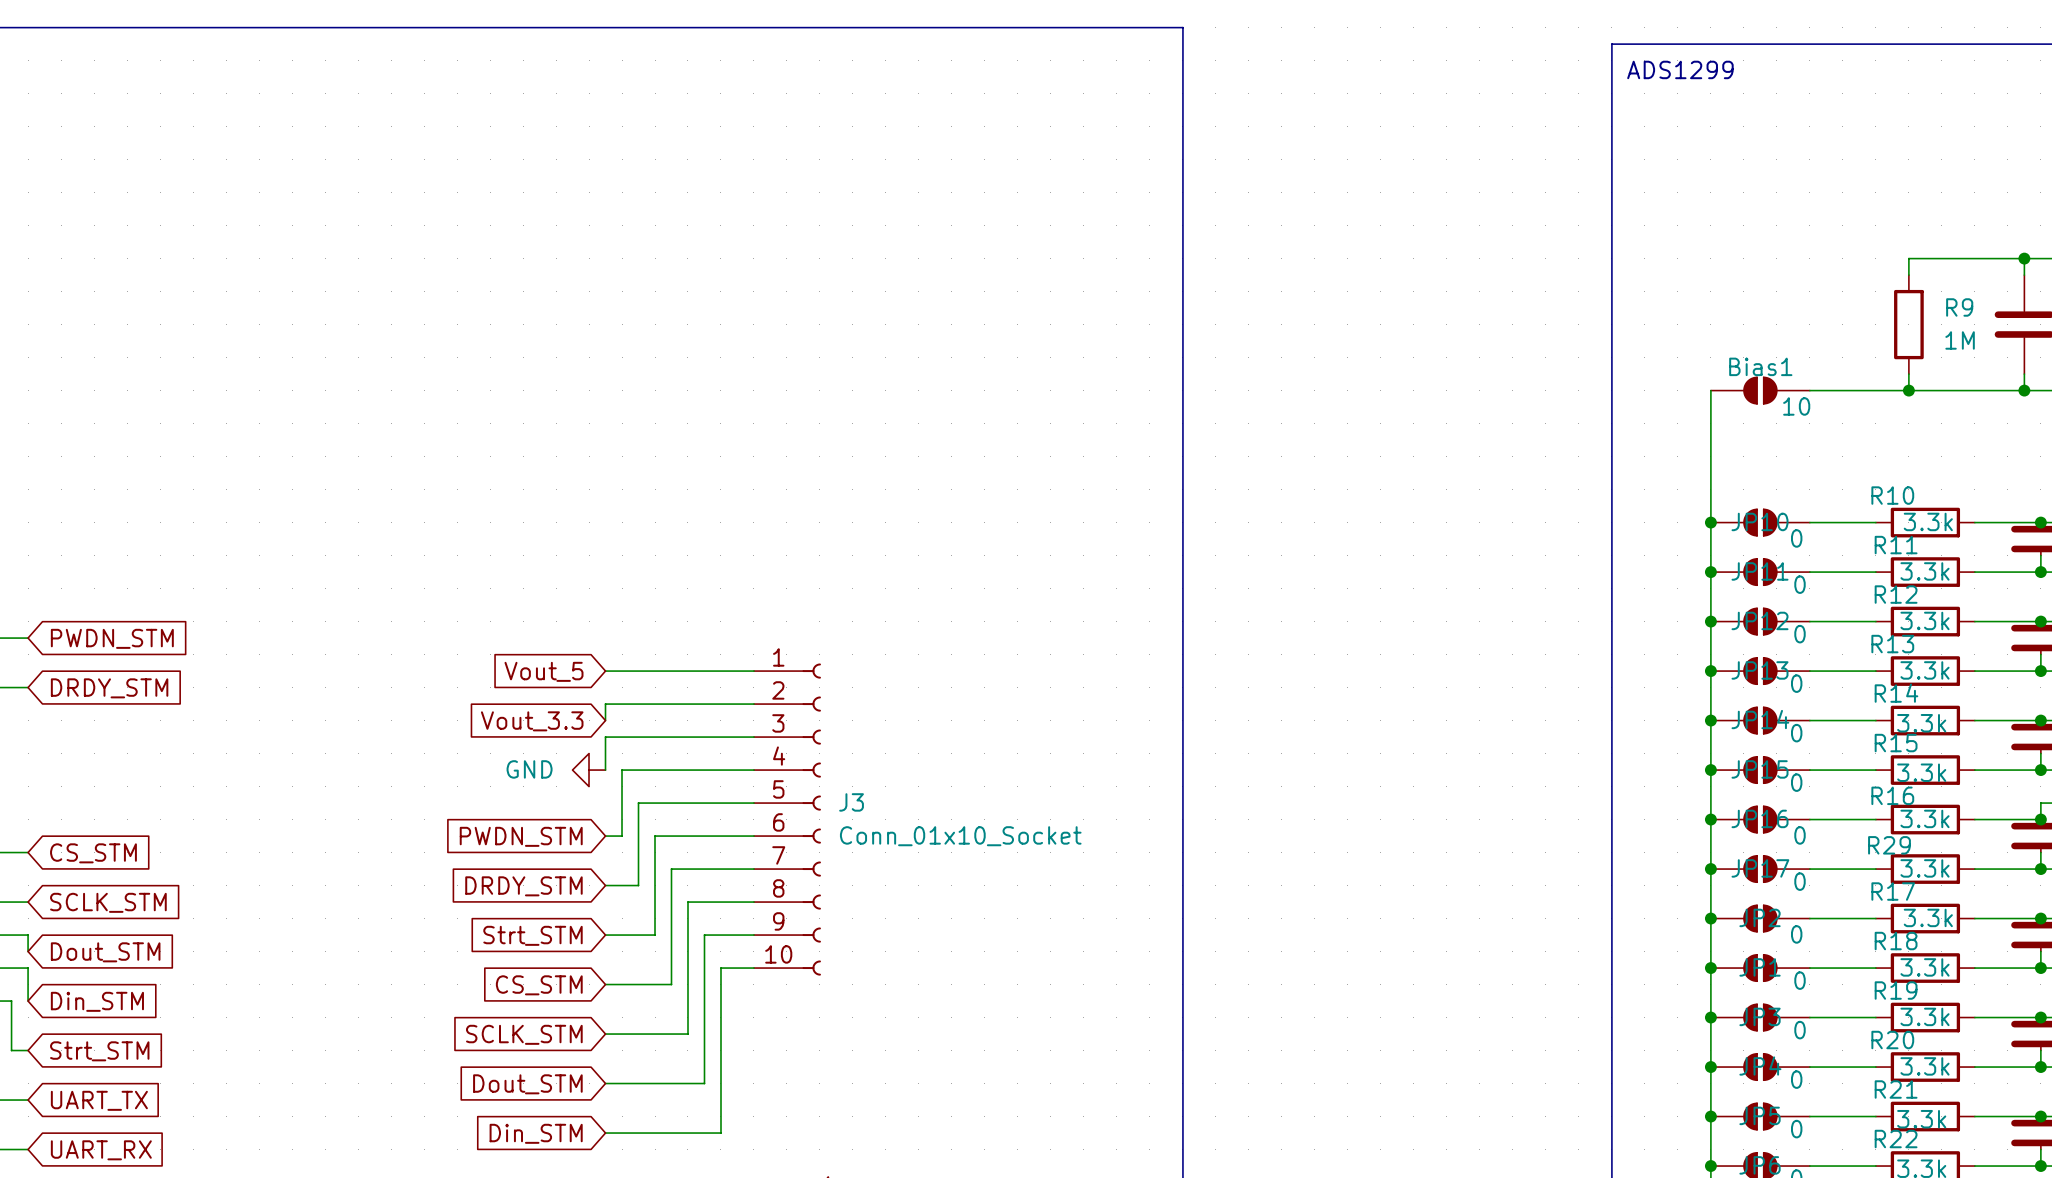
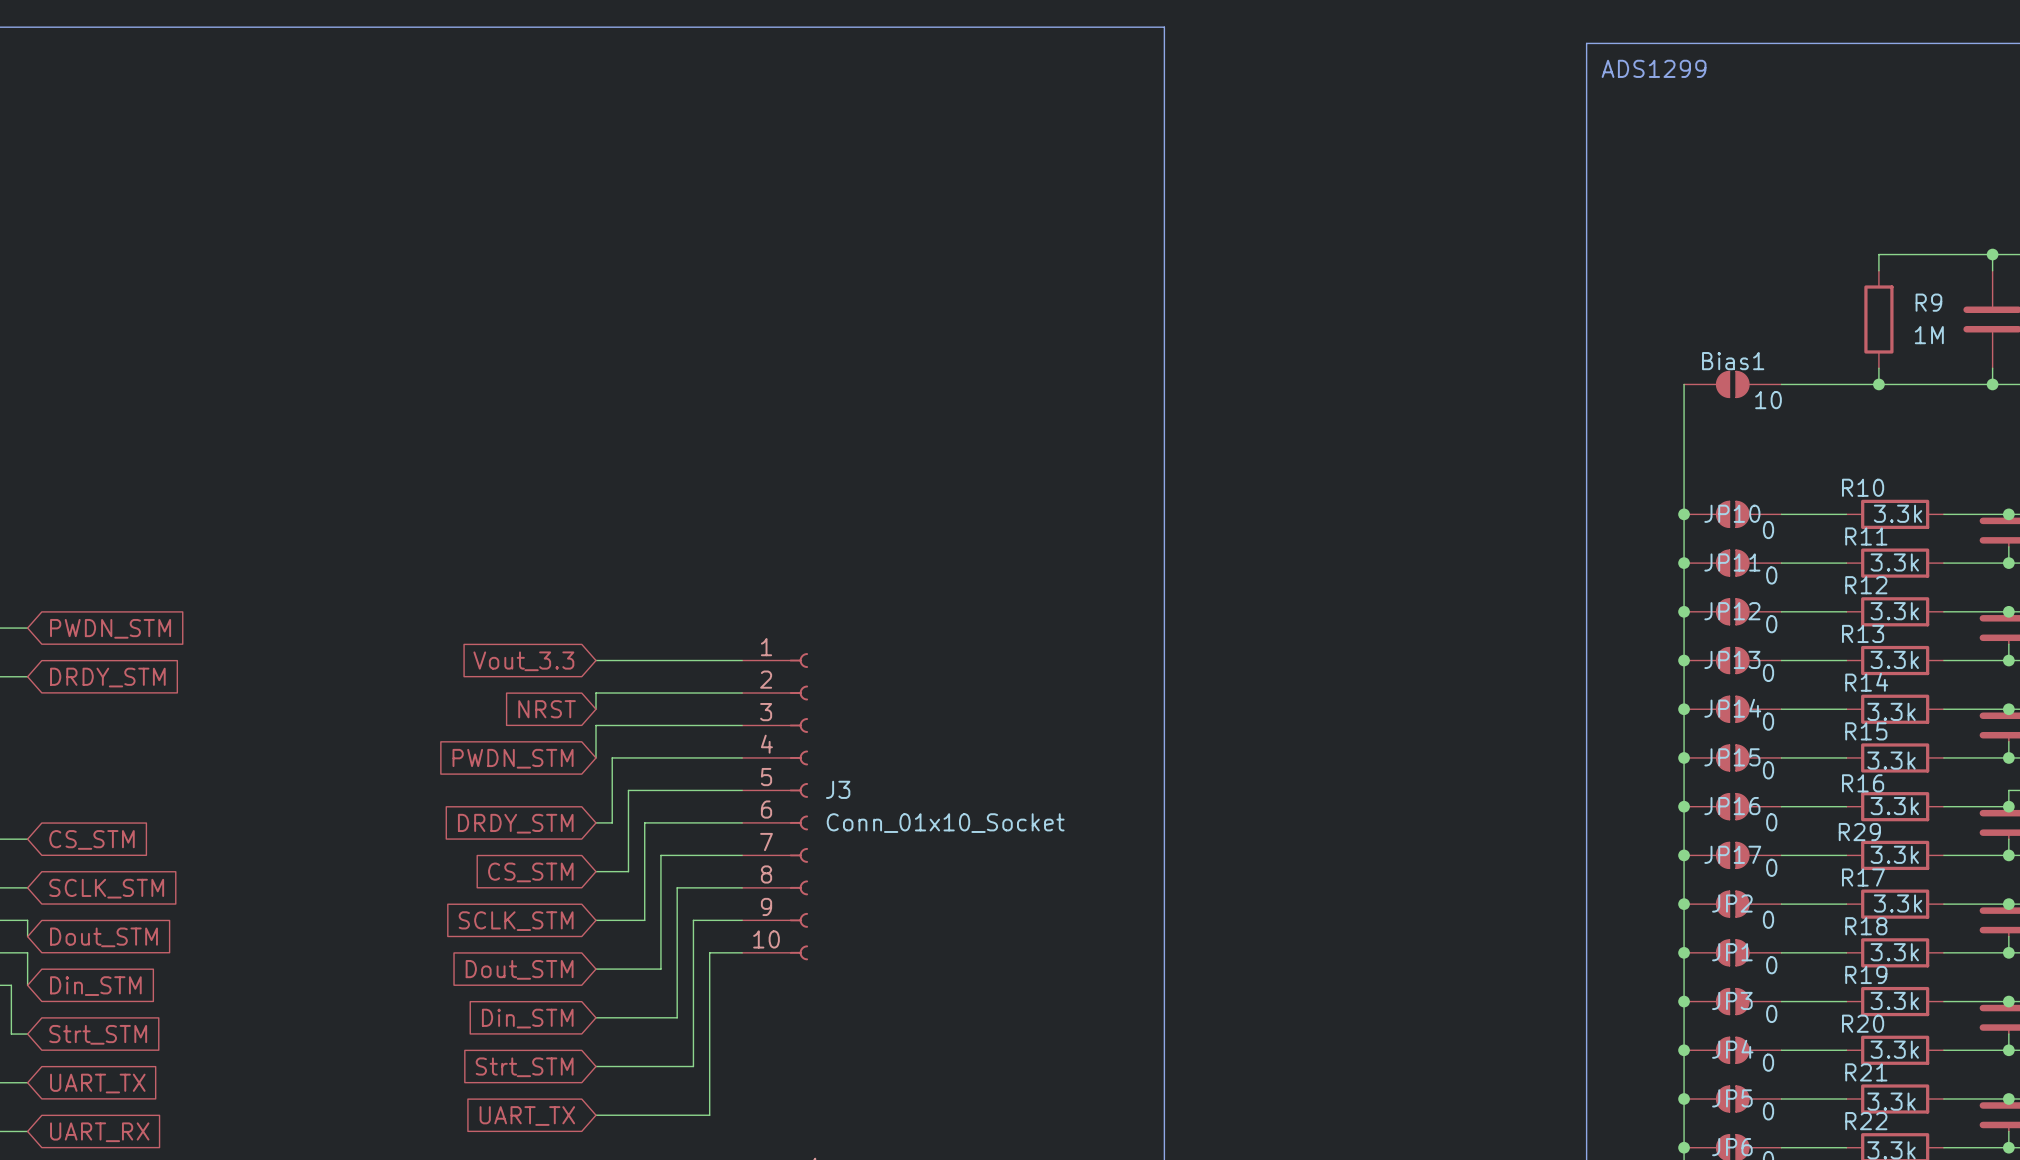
global label: Vout_5 (544, 671) -> Vout_3.3 (523, 661)
global label: Vout_3.3 (532, 721) -> NRST (547, 709)
global label: none -> PWDN_STM (513, 758)
power symbol: GND (589, 770) -> none
global label: PWDN_STM (521, 836) -> DRDY_STM (515, 823)
global label: DRDY_STM (523, 886) -> CS_STM (530, 872)
global label: Strt_STM (533, 935) -> SCLK_STM (516, 921)
global label: CS_STM (539, 985) -> Dout_STM (519, 969)
global label: SCLK_STM (524, 1034) -> Din_STM (527, 1018)
global label: Dout_STM (527, 1084) -> Strt_STM (524, 1067)
global label: Din_STM (536, 1133) -> UART_TX (527, 1116)

